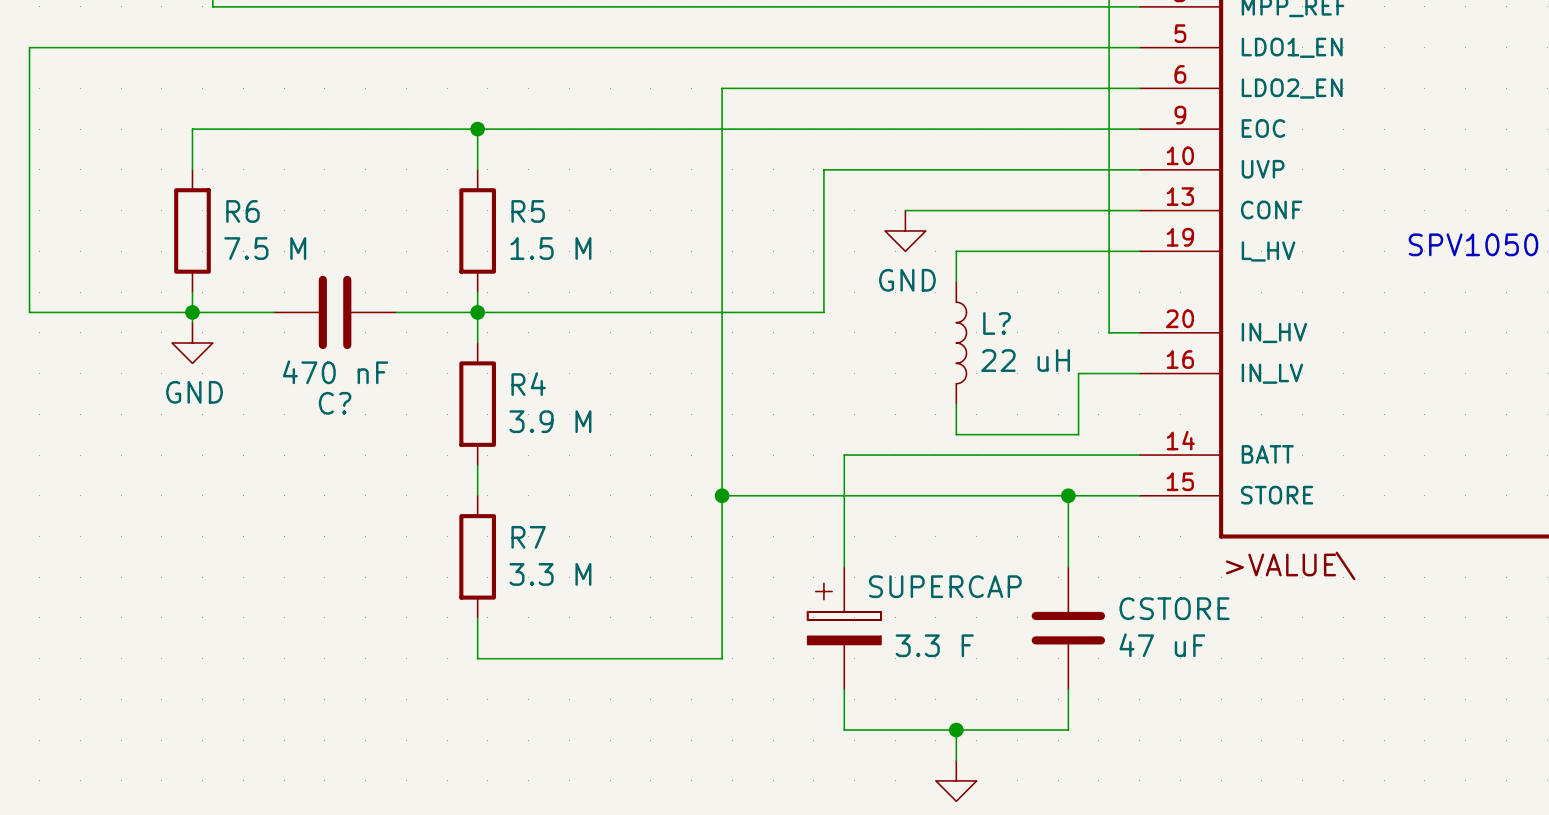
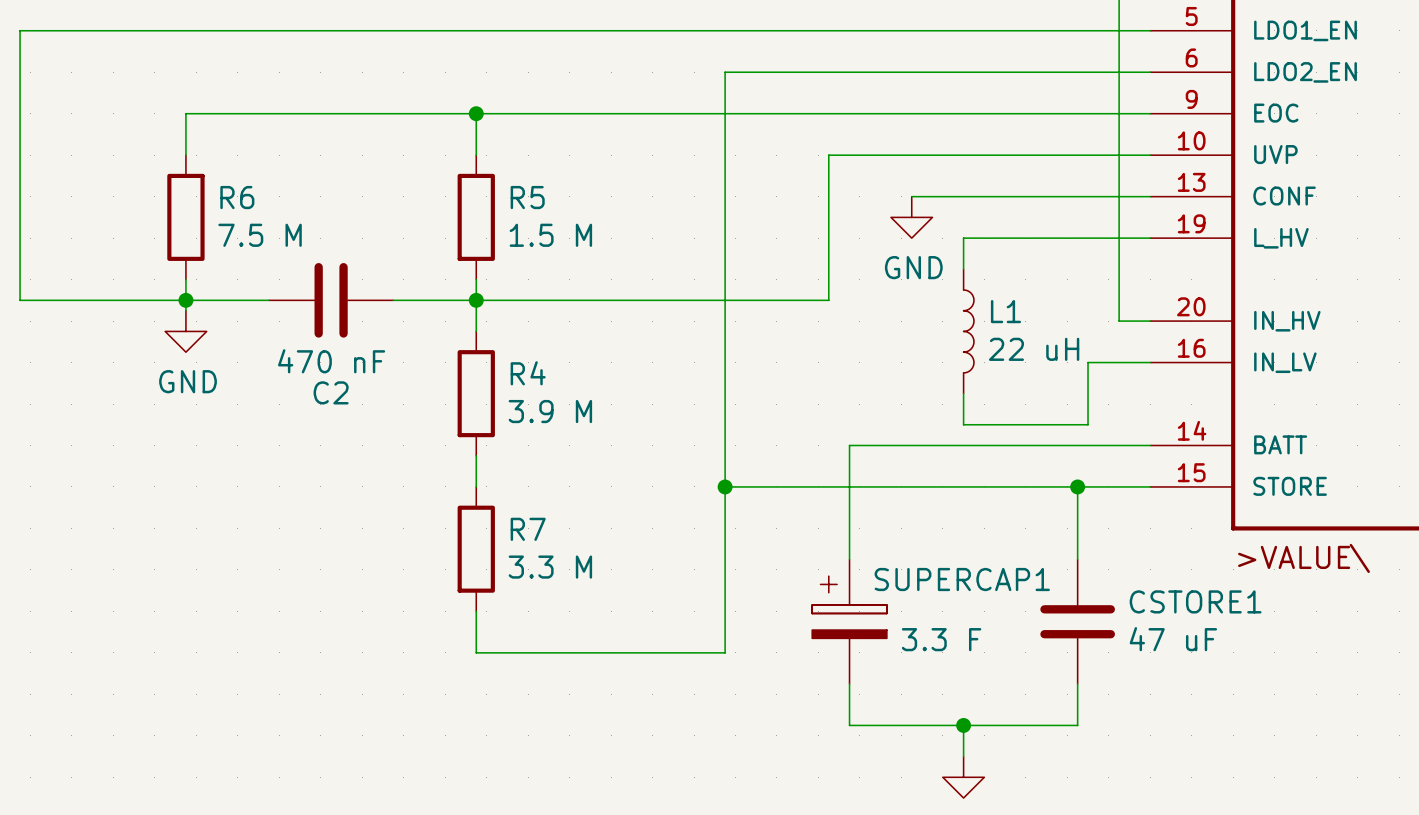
L? name: L? (996, 323) -> L1 (1005, 311)
C? name: C? (335, 403) -> C2 (331, 392)
SUPERCAP name: SUPERCAP (945, 586) -> SUPERCAP1 (962, 579)
CSTORE name: CSTORE (1174, 608) -> CSTORE1 (1195, 601)

